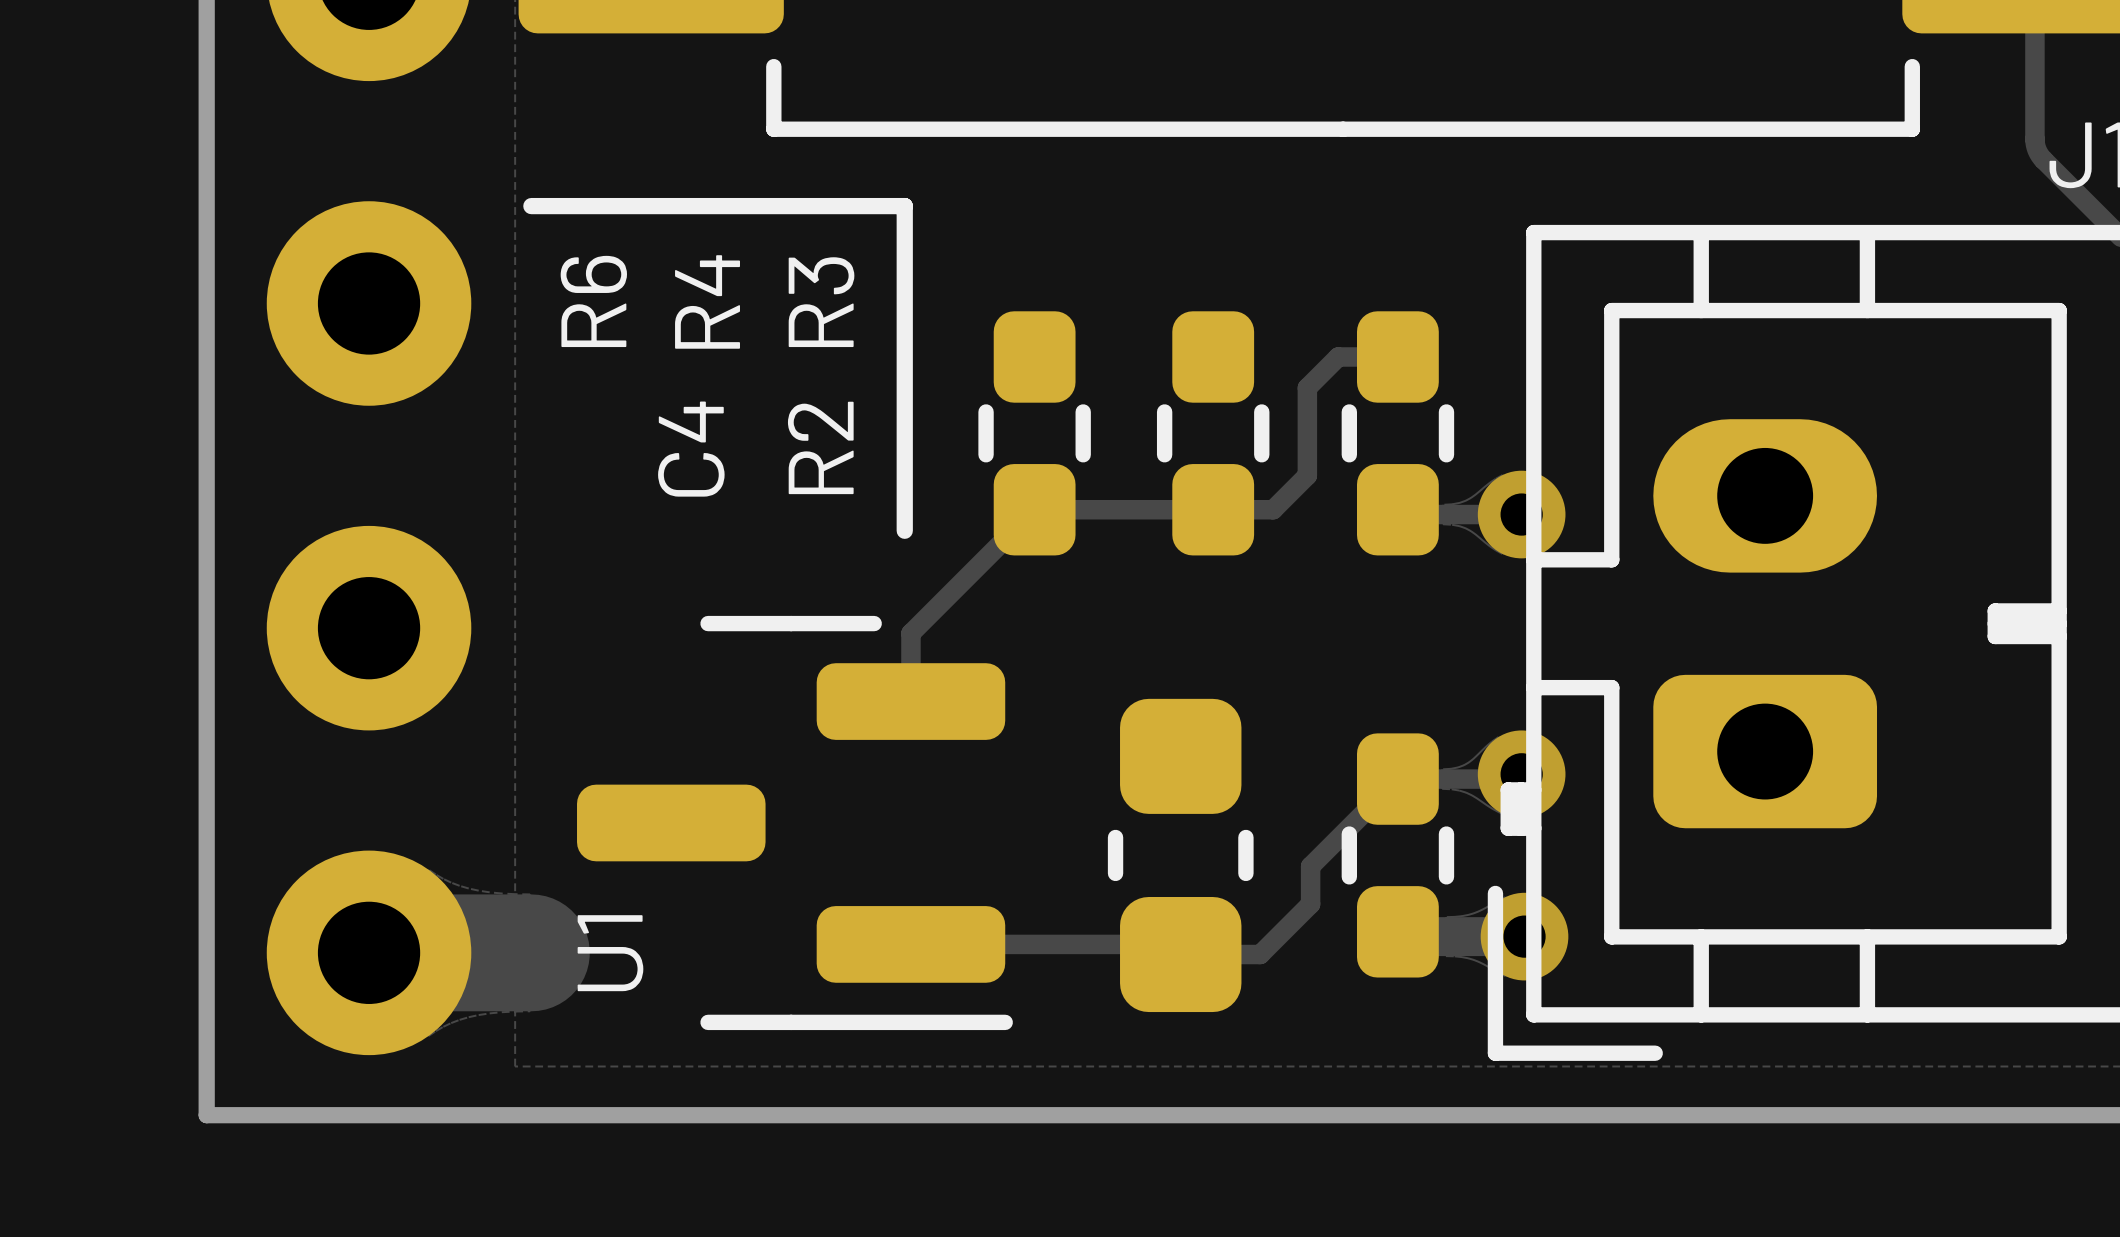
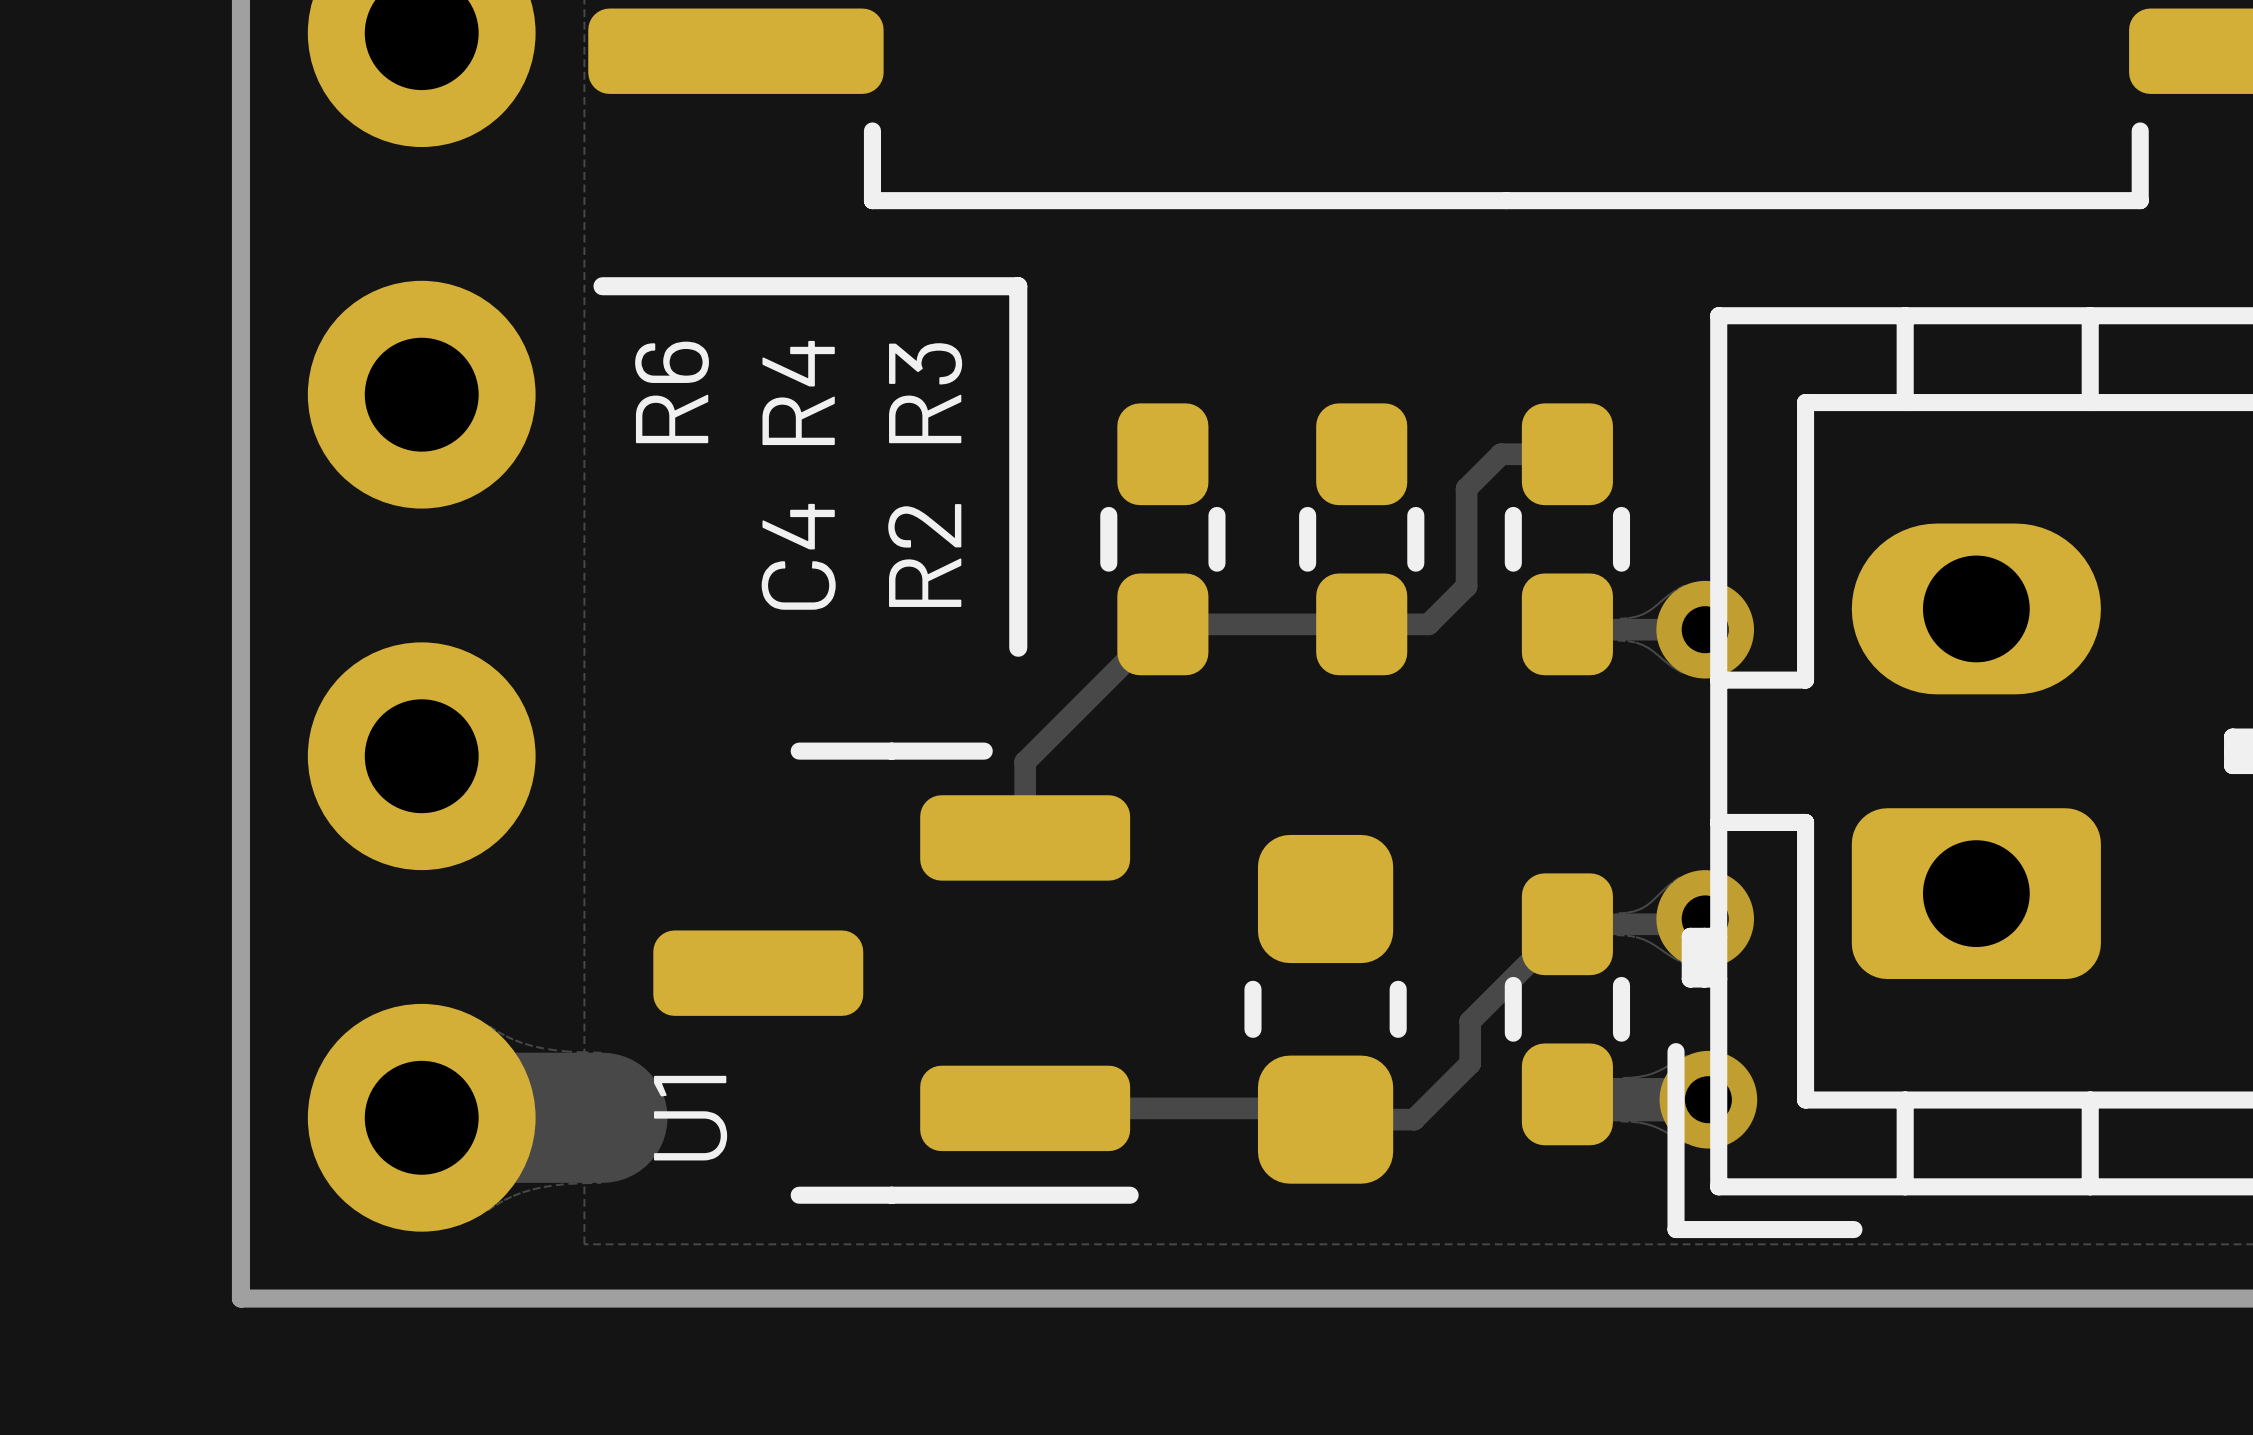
C4 name position: C4 (691, 449) -> C4 (798, 556)

